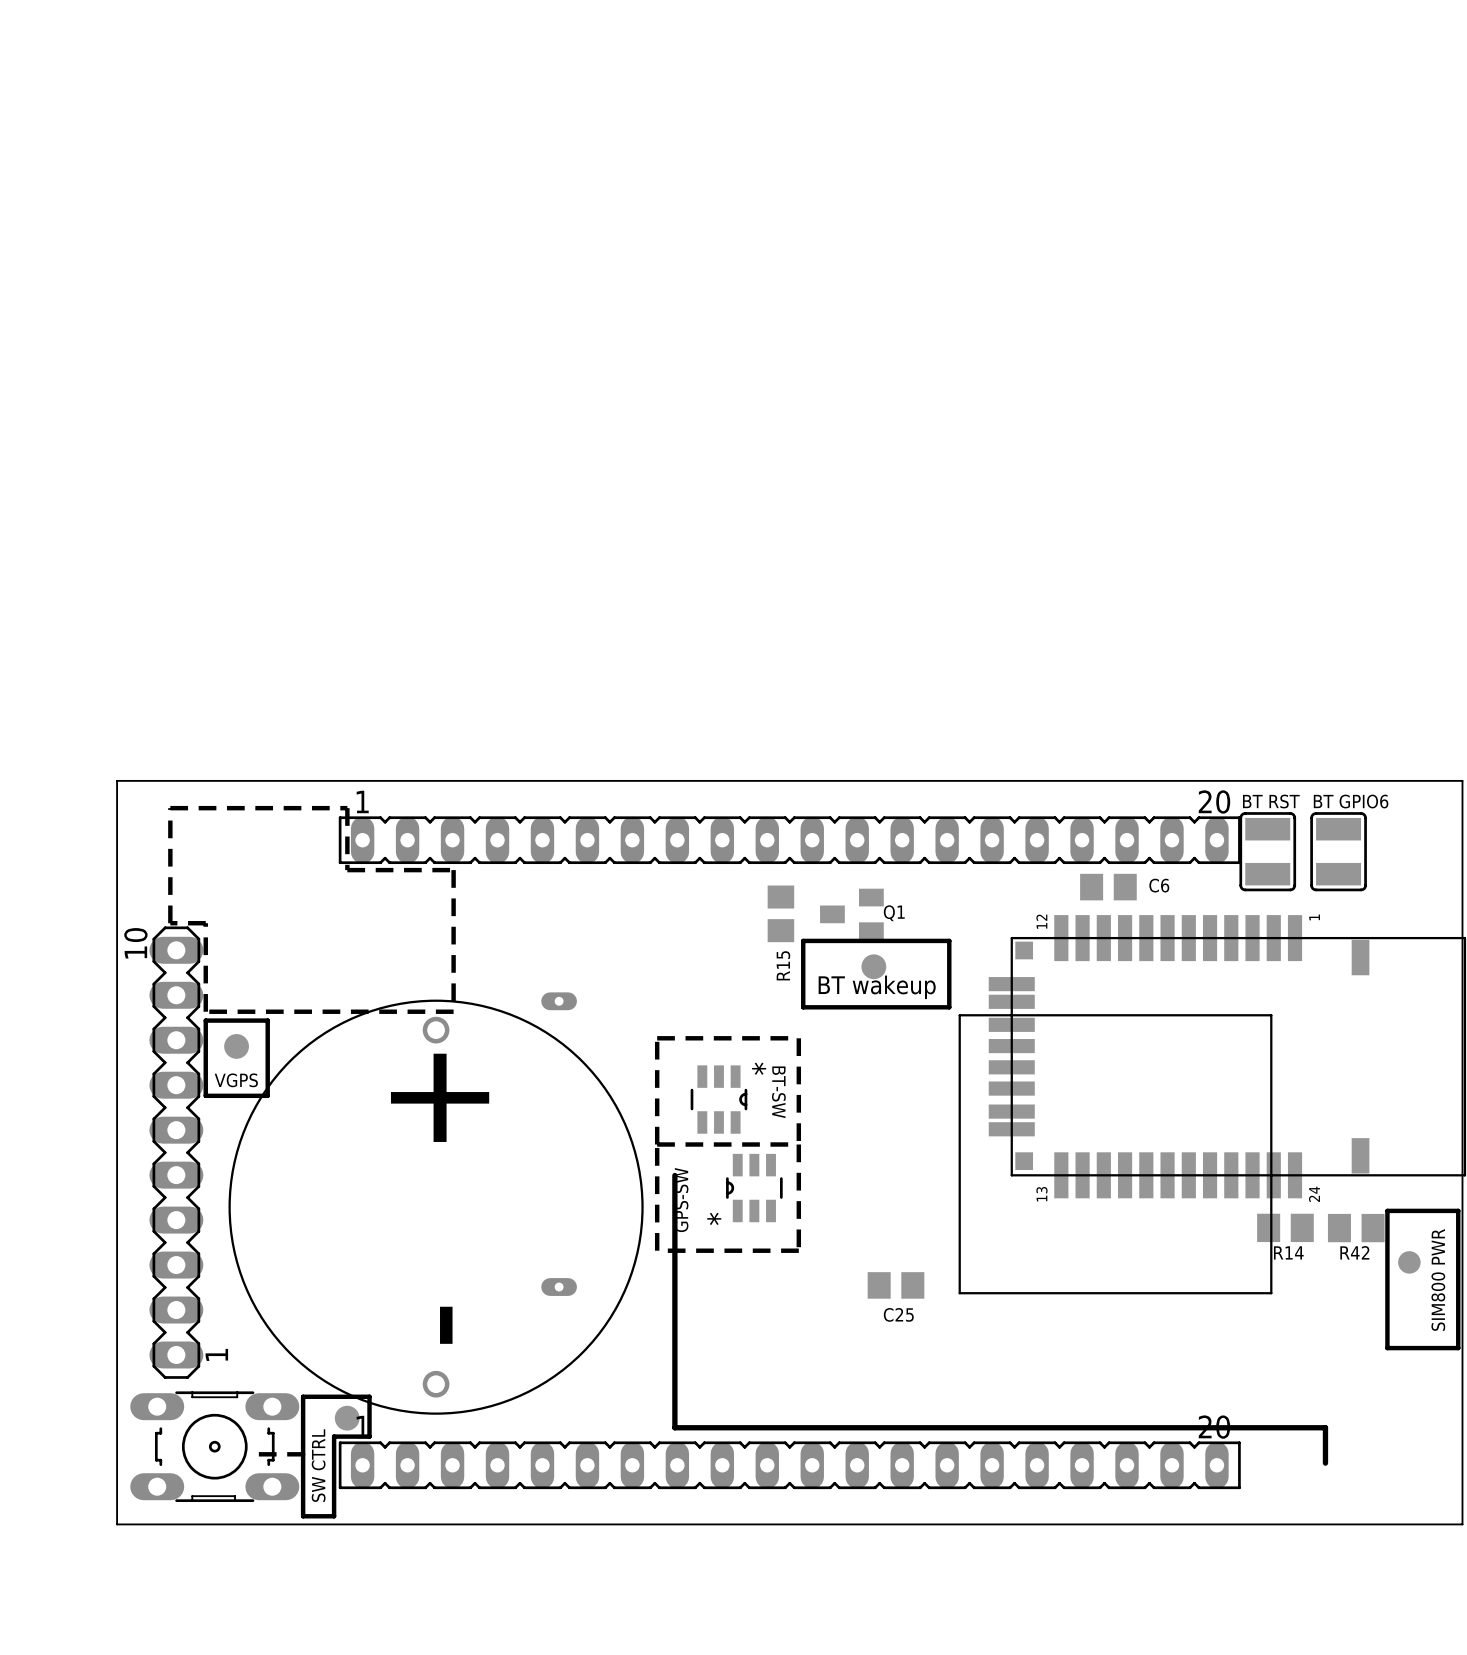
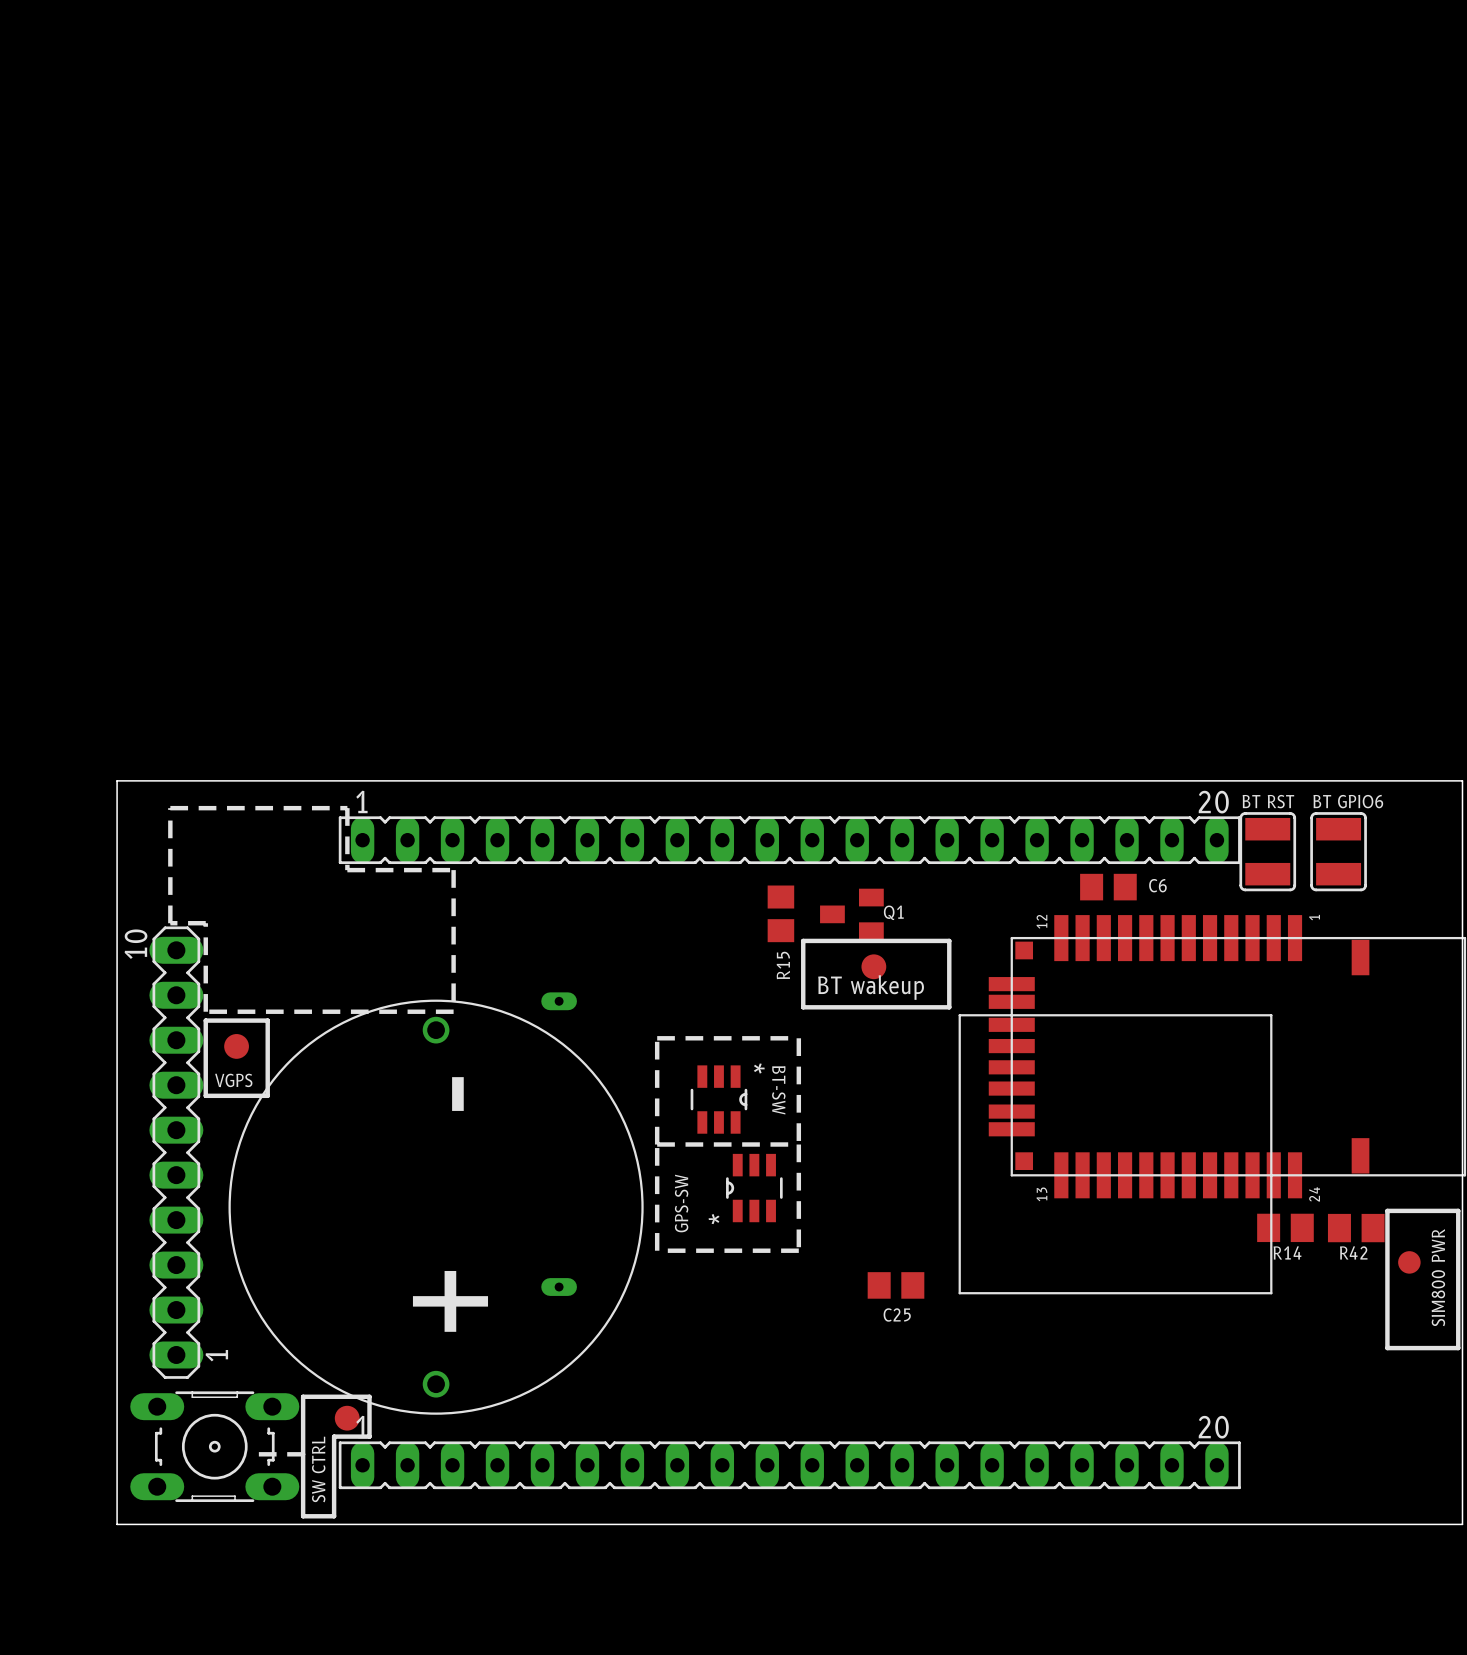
part text position: + (440, 1097) -> + (450, 1301)
line: (674, 1175) (674, 1427) (1325, 1427) (1325, 1463) -> none
part text position: - (446, 1325) -> - (457, 1094)

